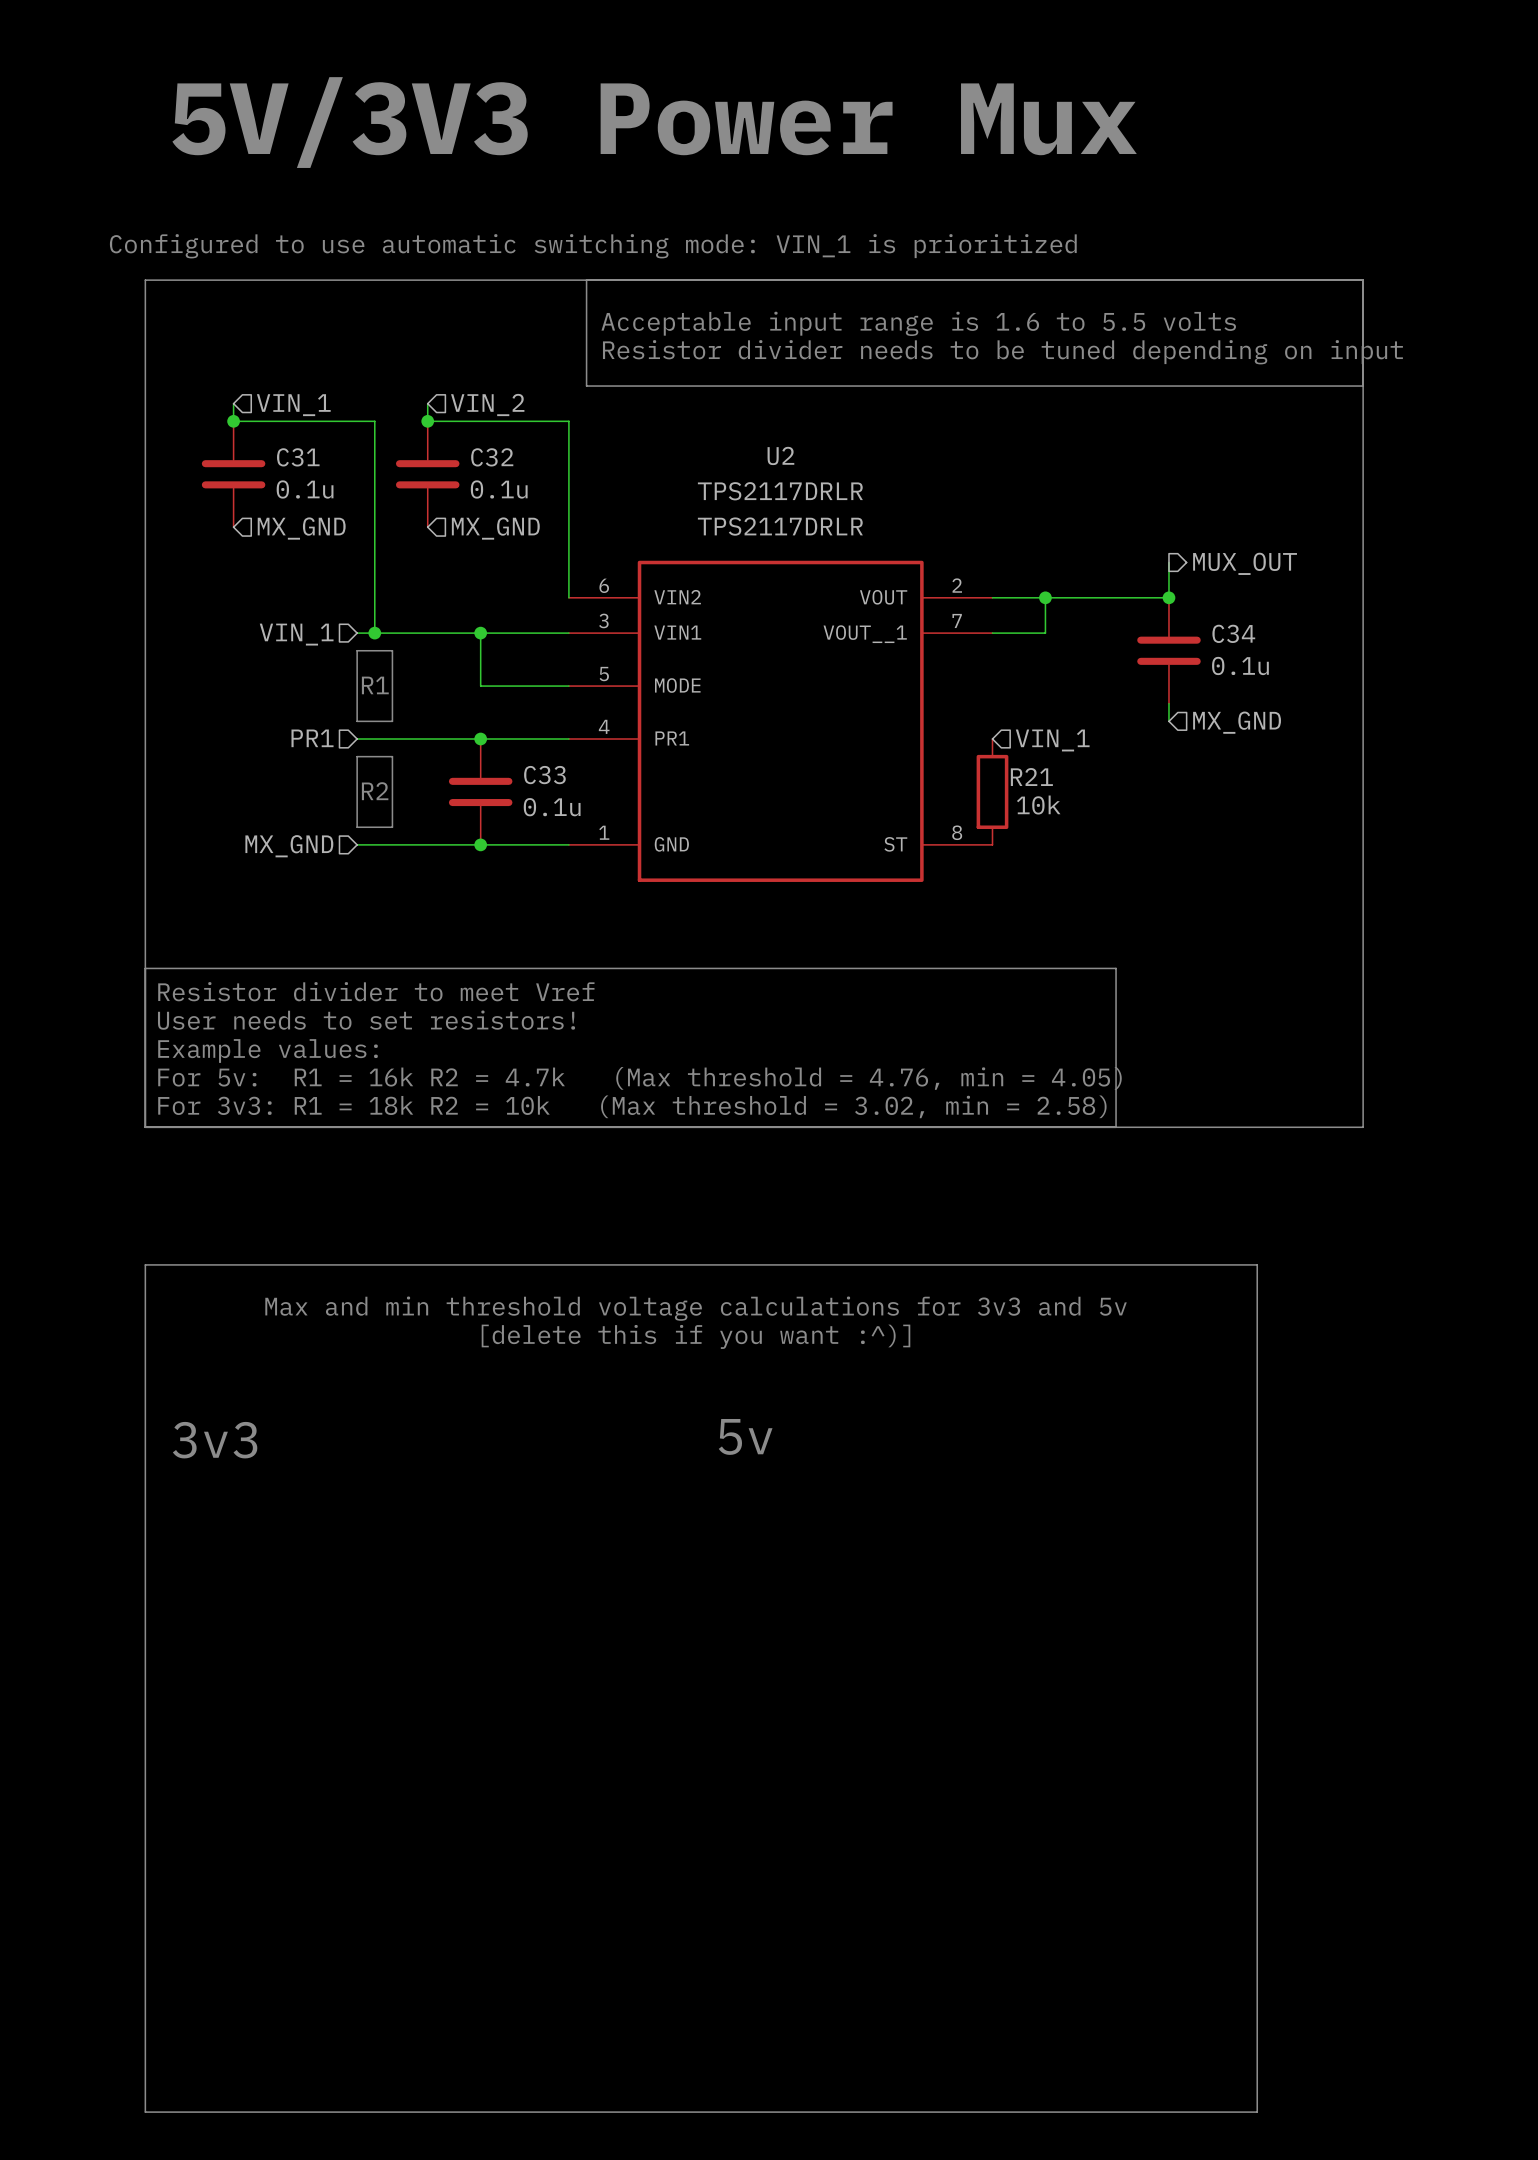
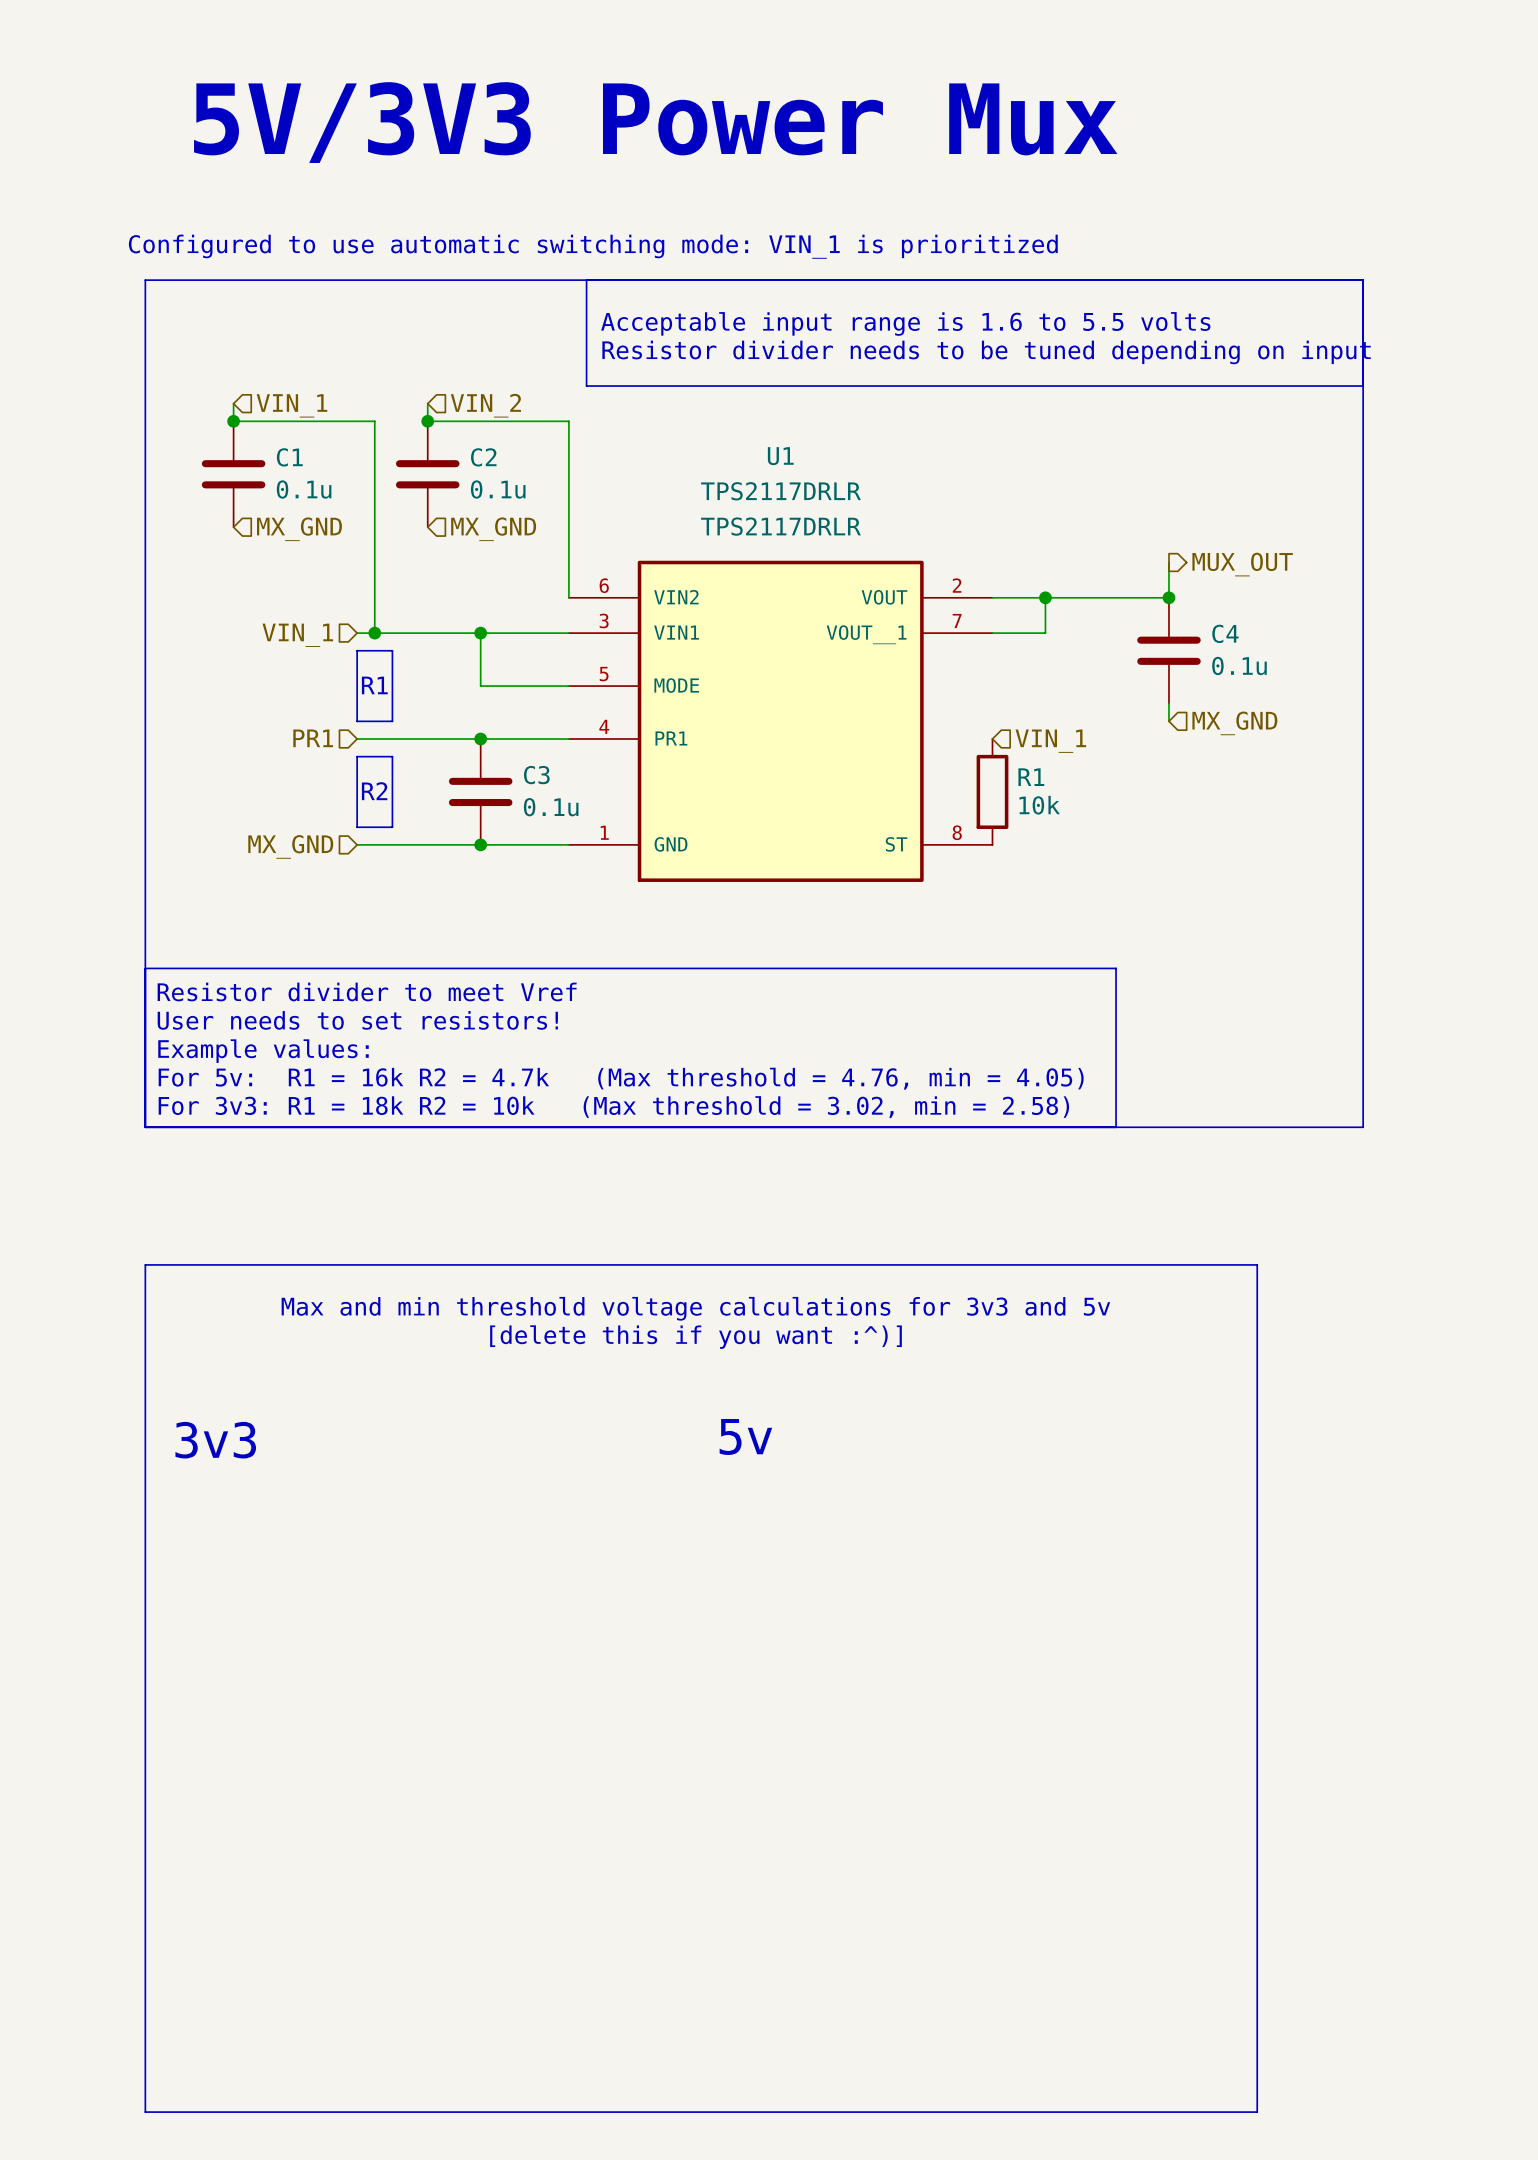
U2 name: U2 (780, 455) -> U1 (780, 456)
C31 name: C31 (298, 457) -> C1 (289, 457)
C32 name: C32 (492, 457) -> C2 (483, 457)
C34 name: C34 (1233, 633) -> C4 (1225, 633)
C33 name: C33 (544, 775) -> C3 (536, 775)
R21 name: R21 (1031, 777) -> R1 (1031, 777)

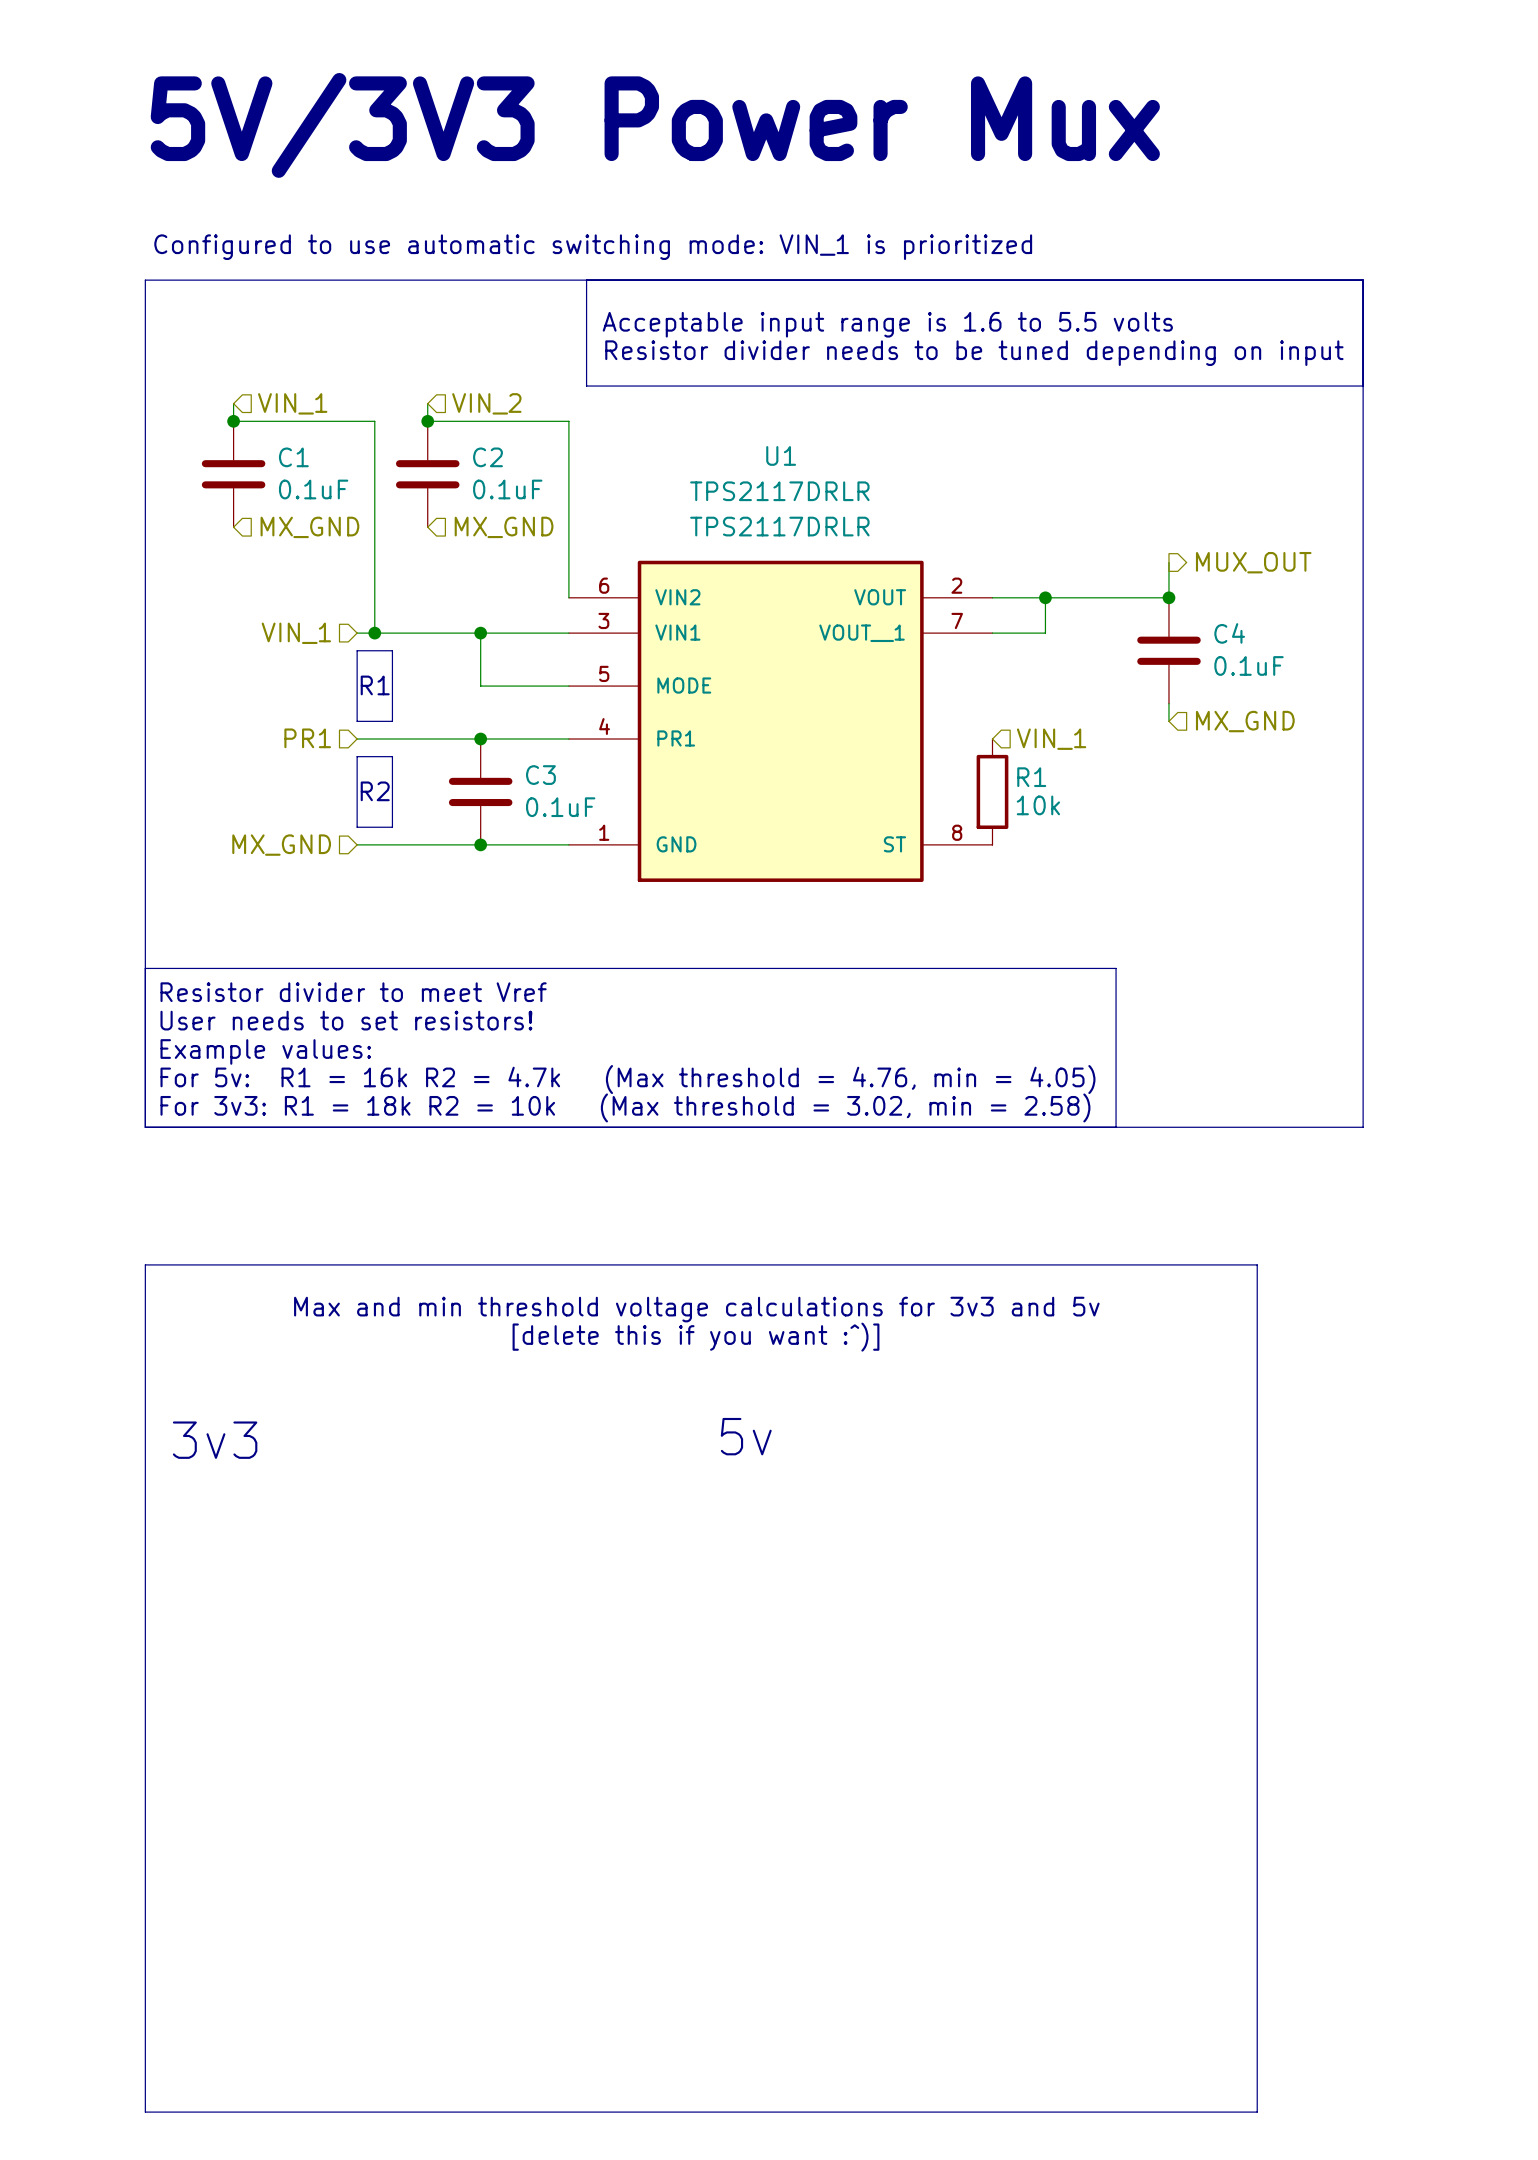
C1 value: 0.1u (304, 489) -> 0.1uF (313, 489)
C2 value: 0.1u (498, 489) -> 0.1uF (507, 489)
C4 value: 0.1u (1239, 665) -> 0.1uF (1249, 665)
C3 value: 0.1u (551, 807) -> 0.1uF (560, 807)

